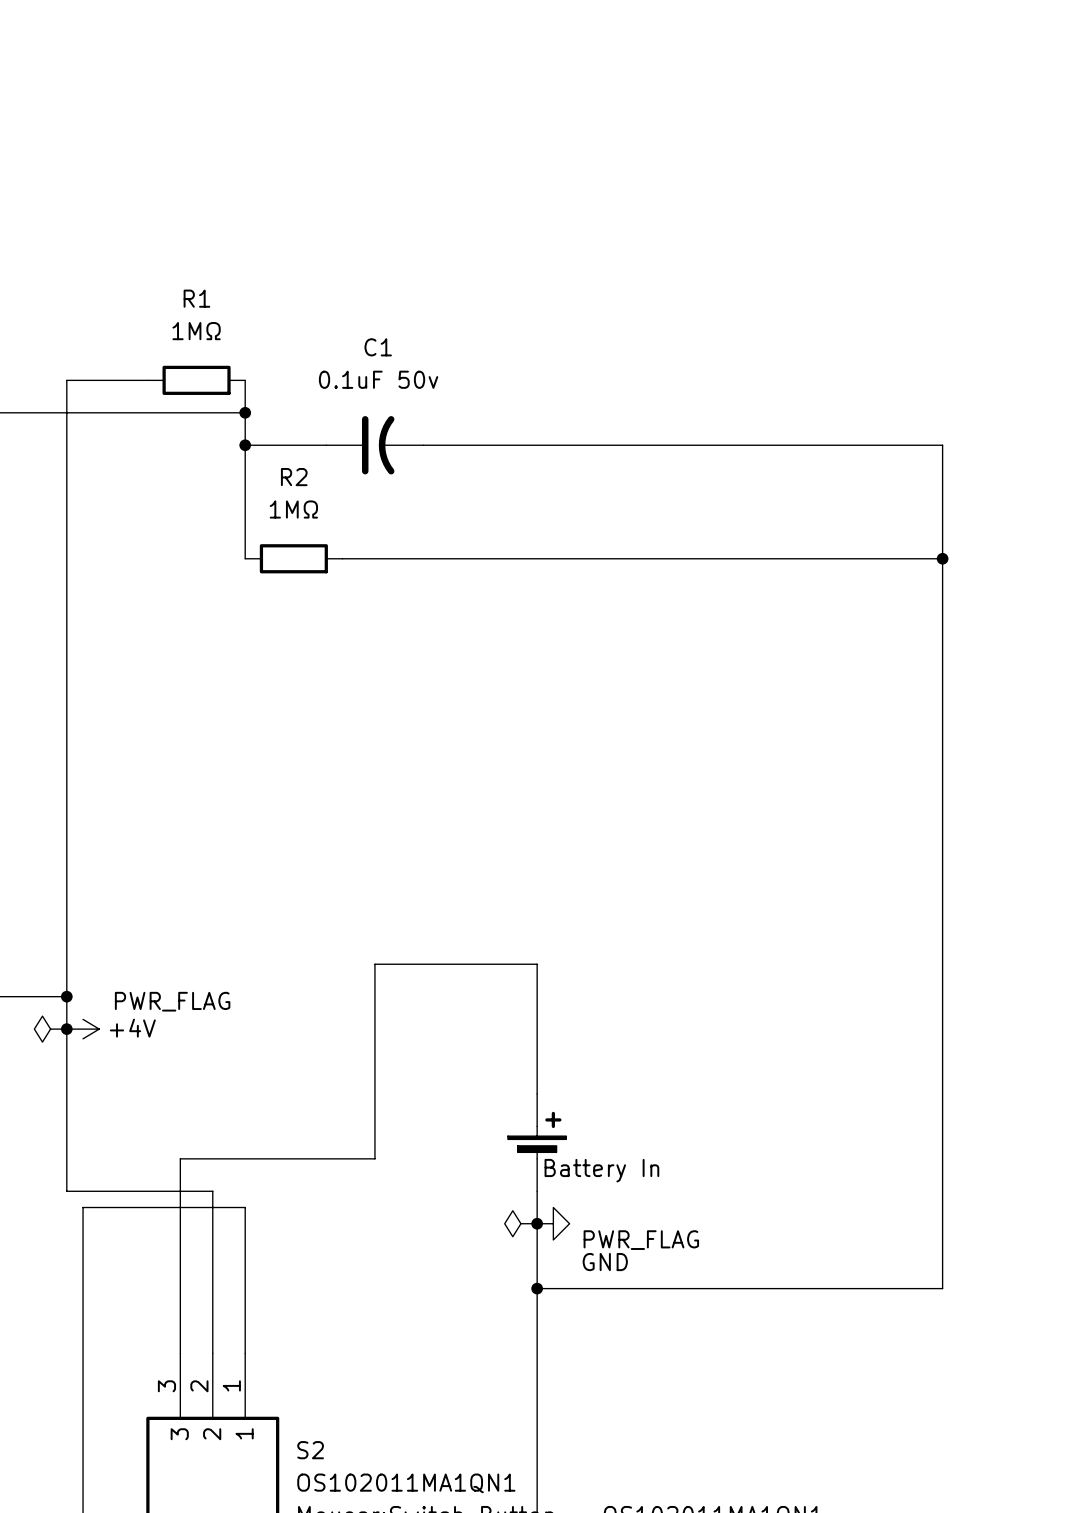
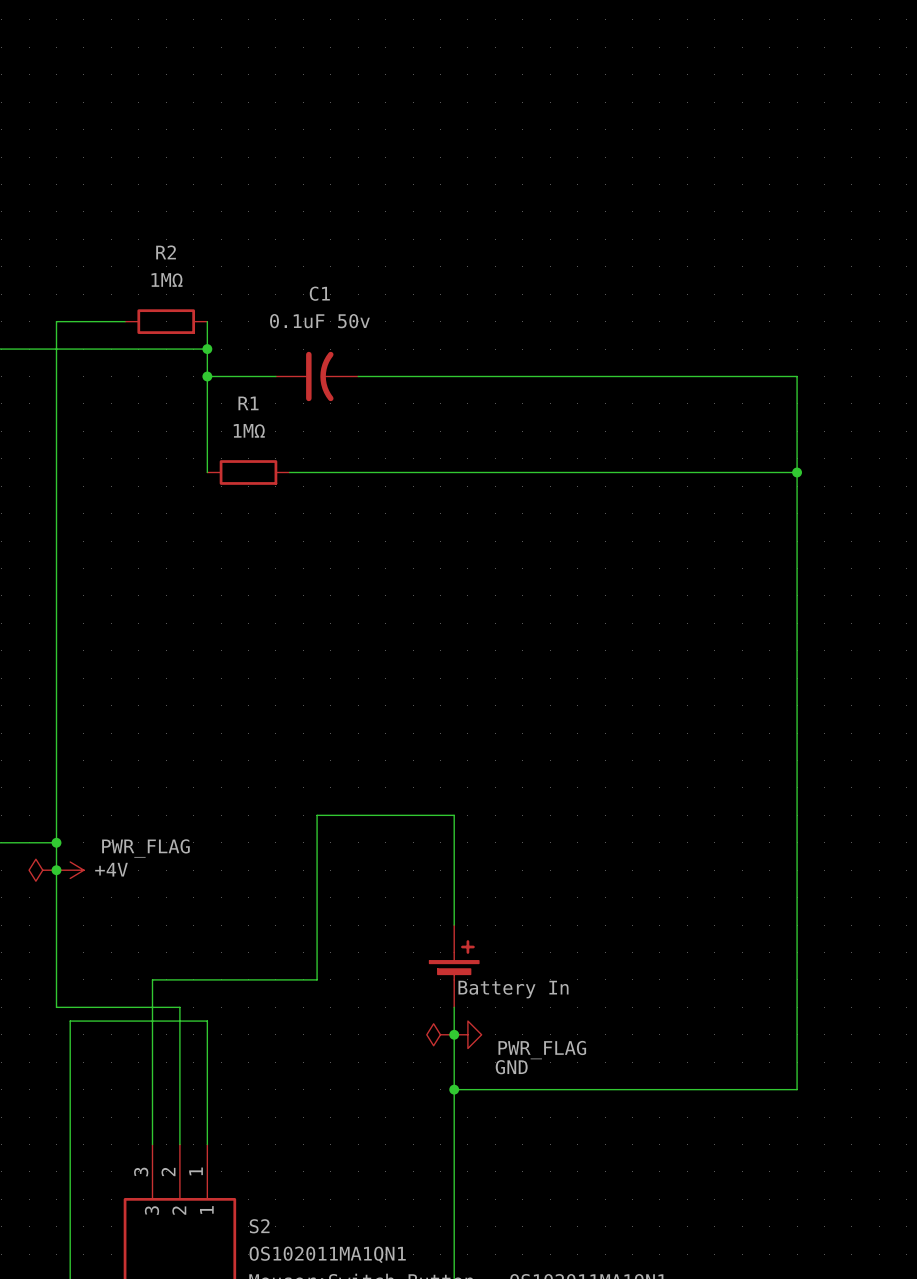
R1 name: R1 (196, 298) -> R2 (166, 252)
R2 name: R2 (294, 477) -> R1 (248, 403)

